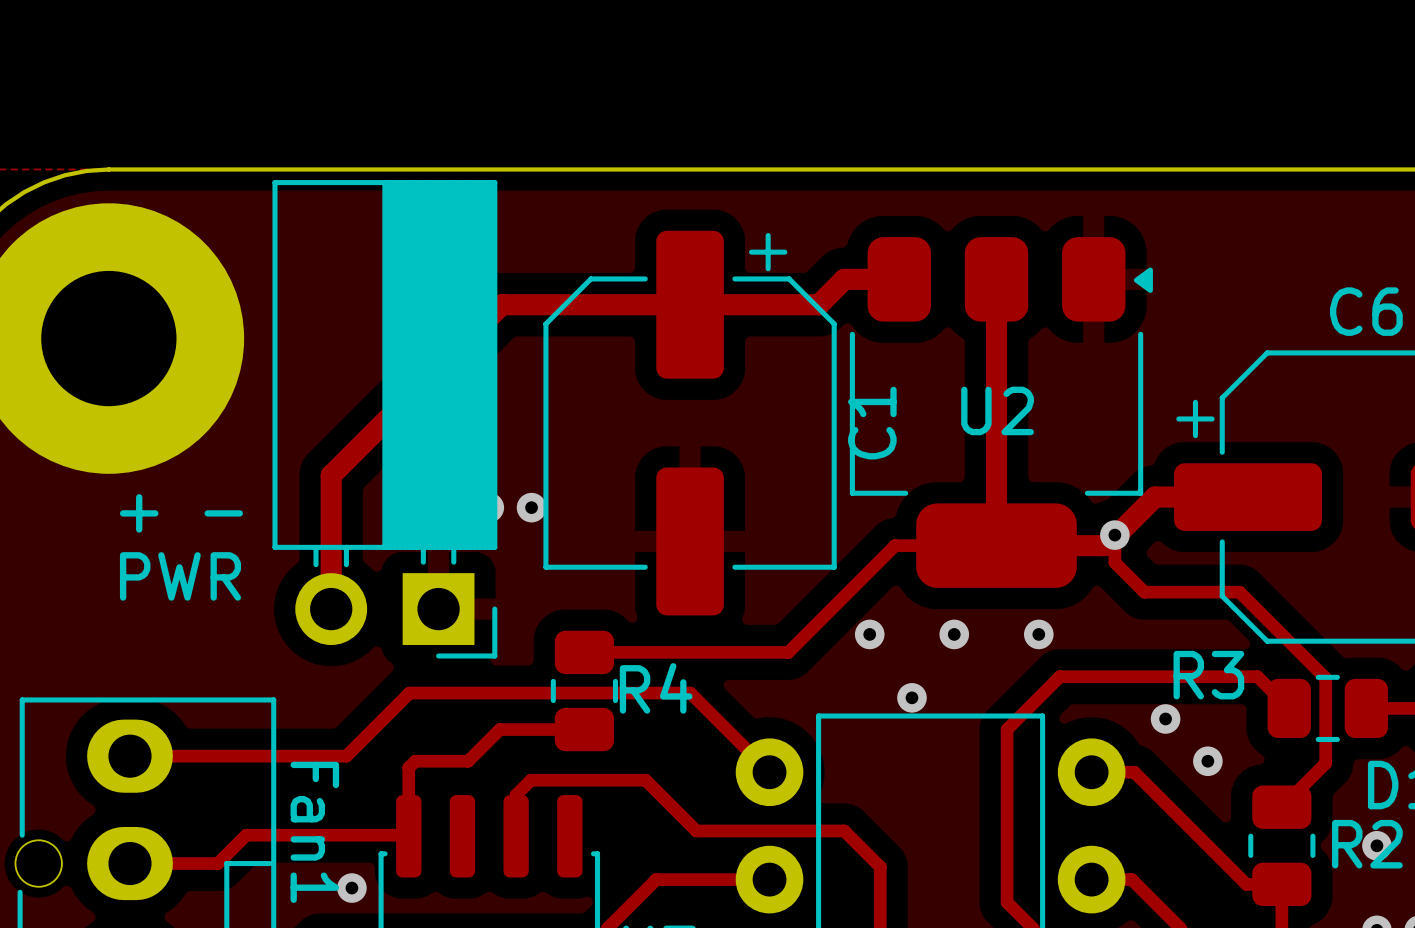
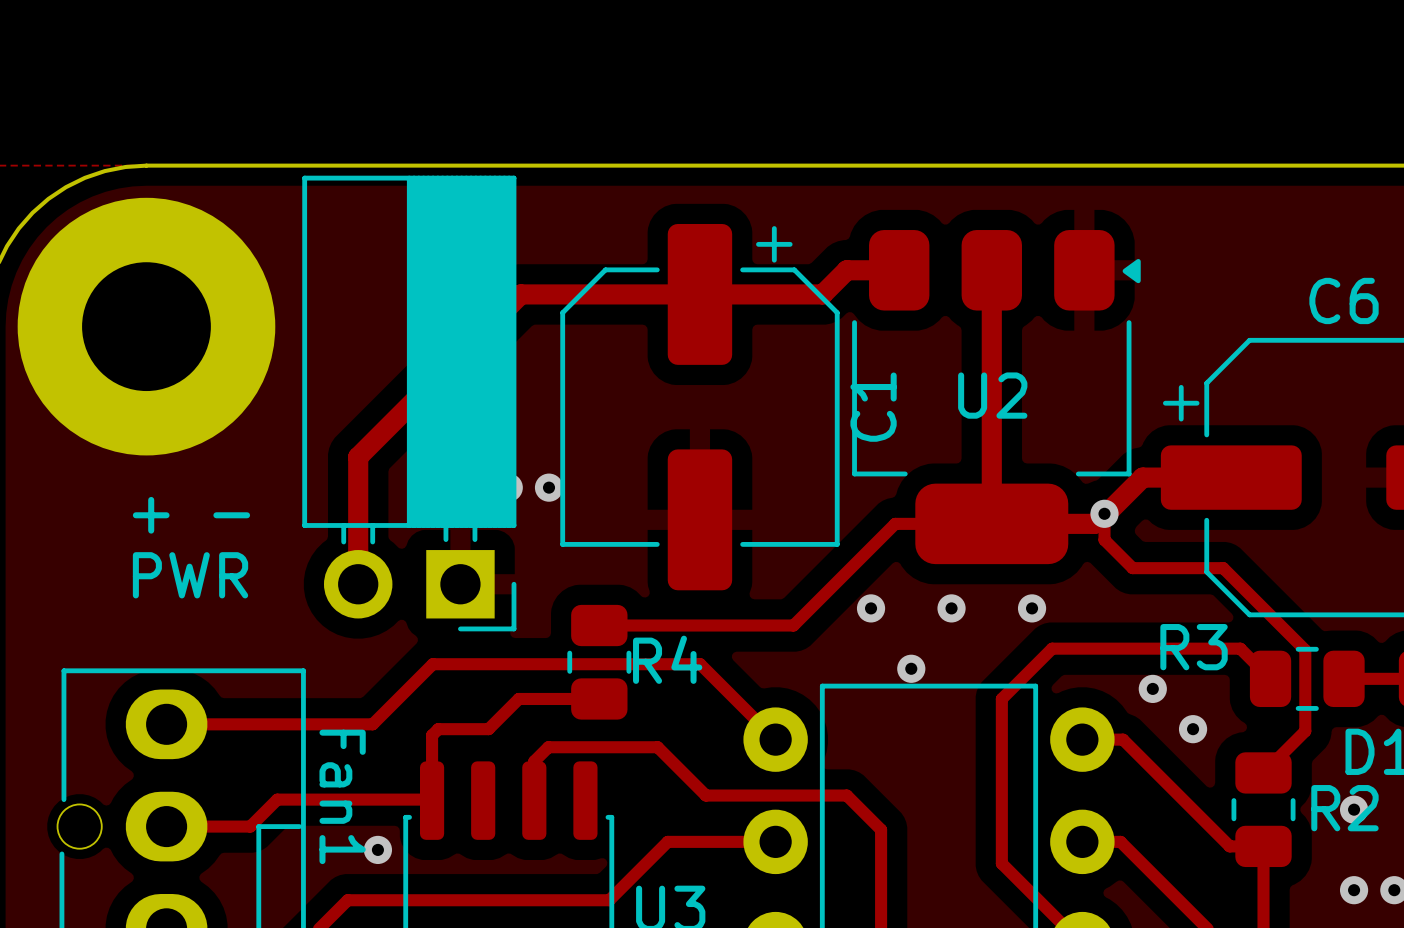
text position: + - (181, 513) -> + - (191, 515)
text position: PWR (180, 576) -> PWR (190, 575)

